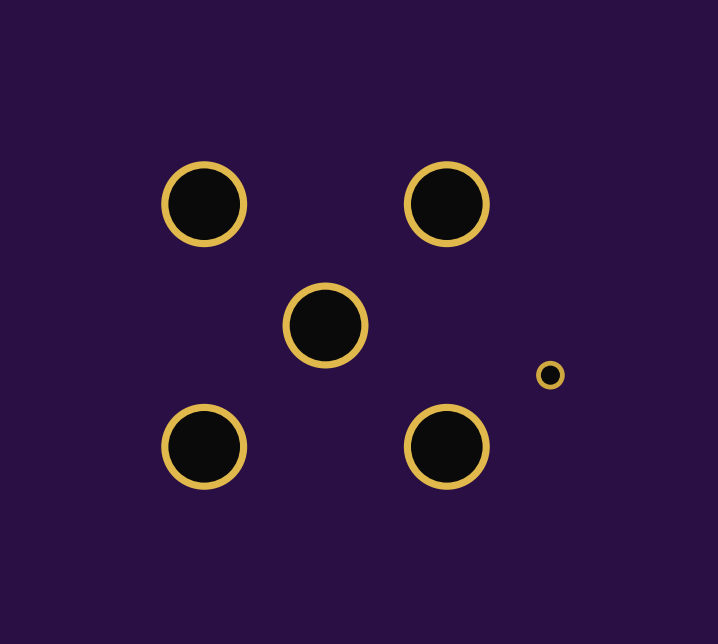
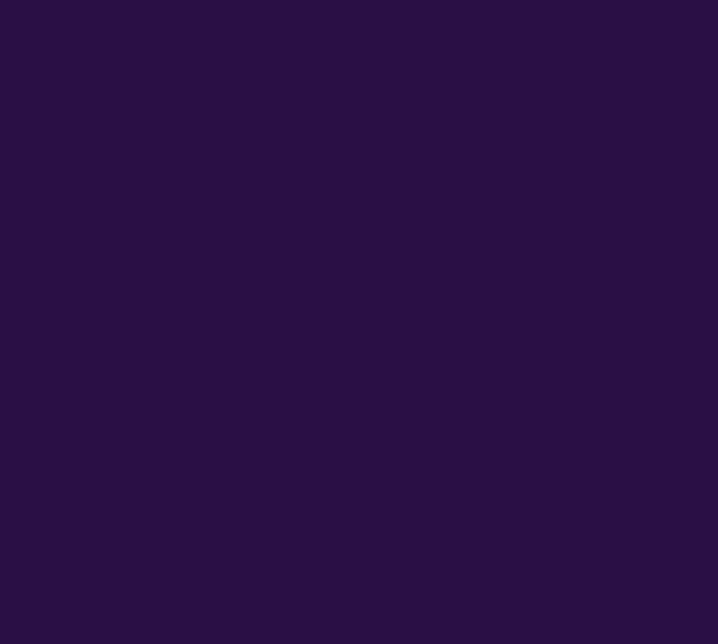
part: (325, 325) -> none
via: (550, 375) -> none

